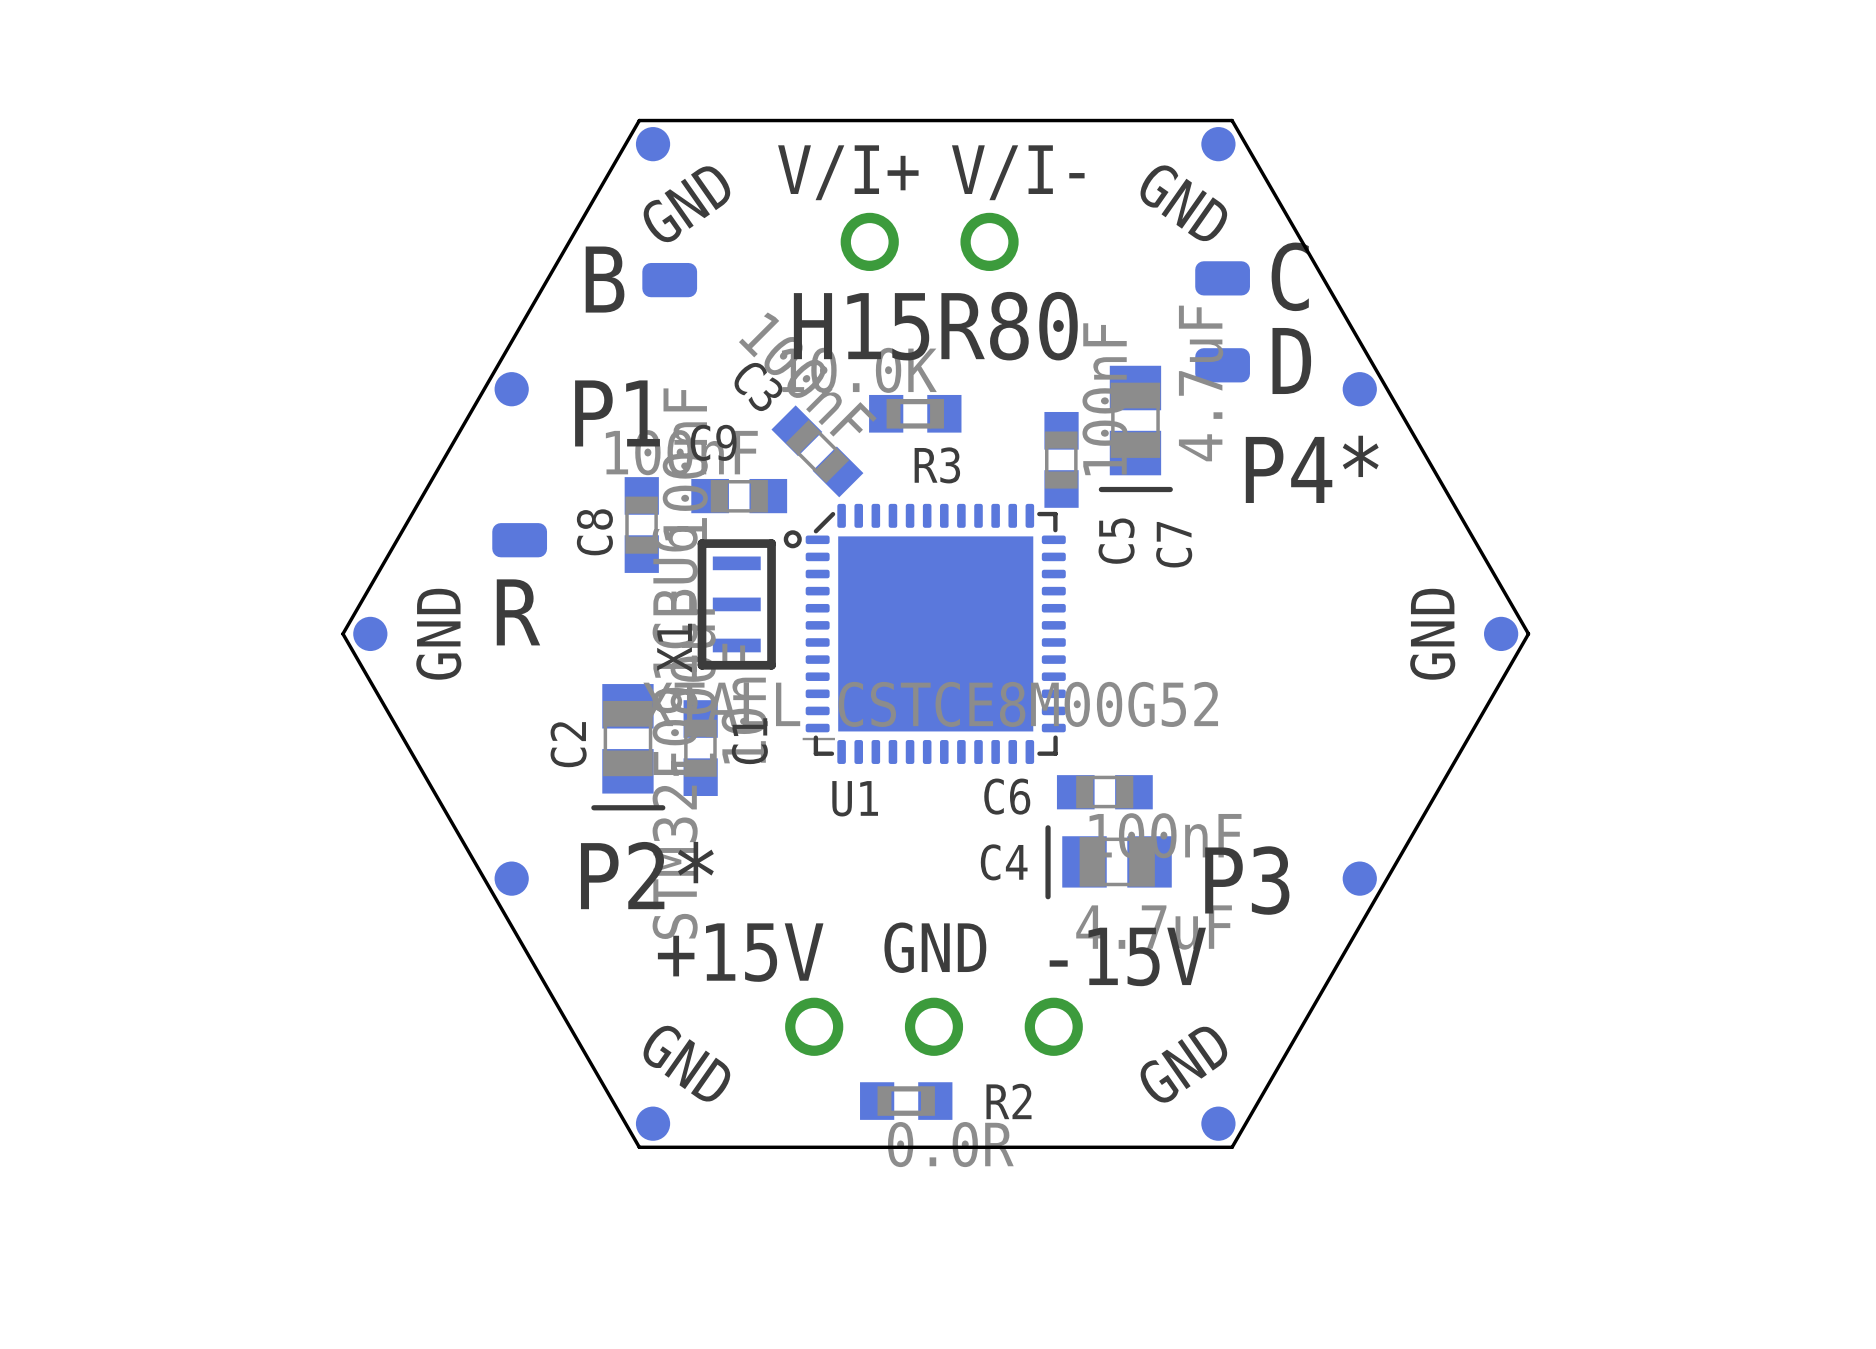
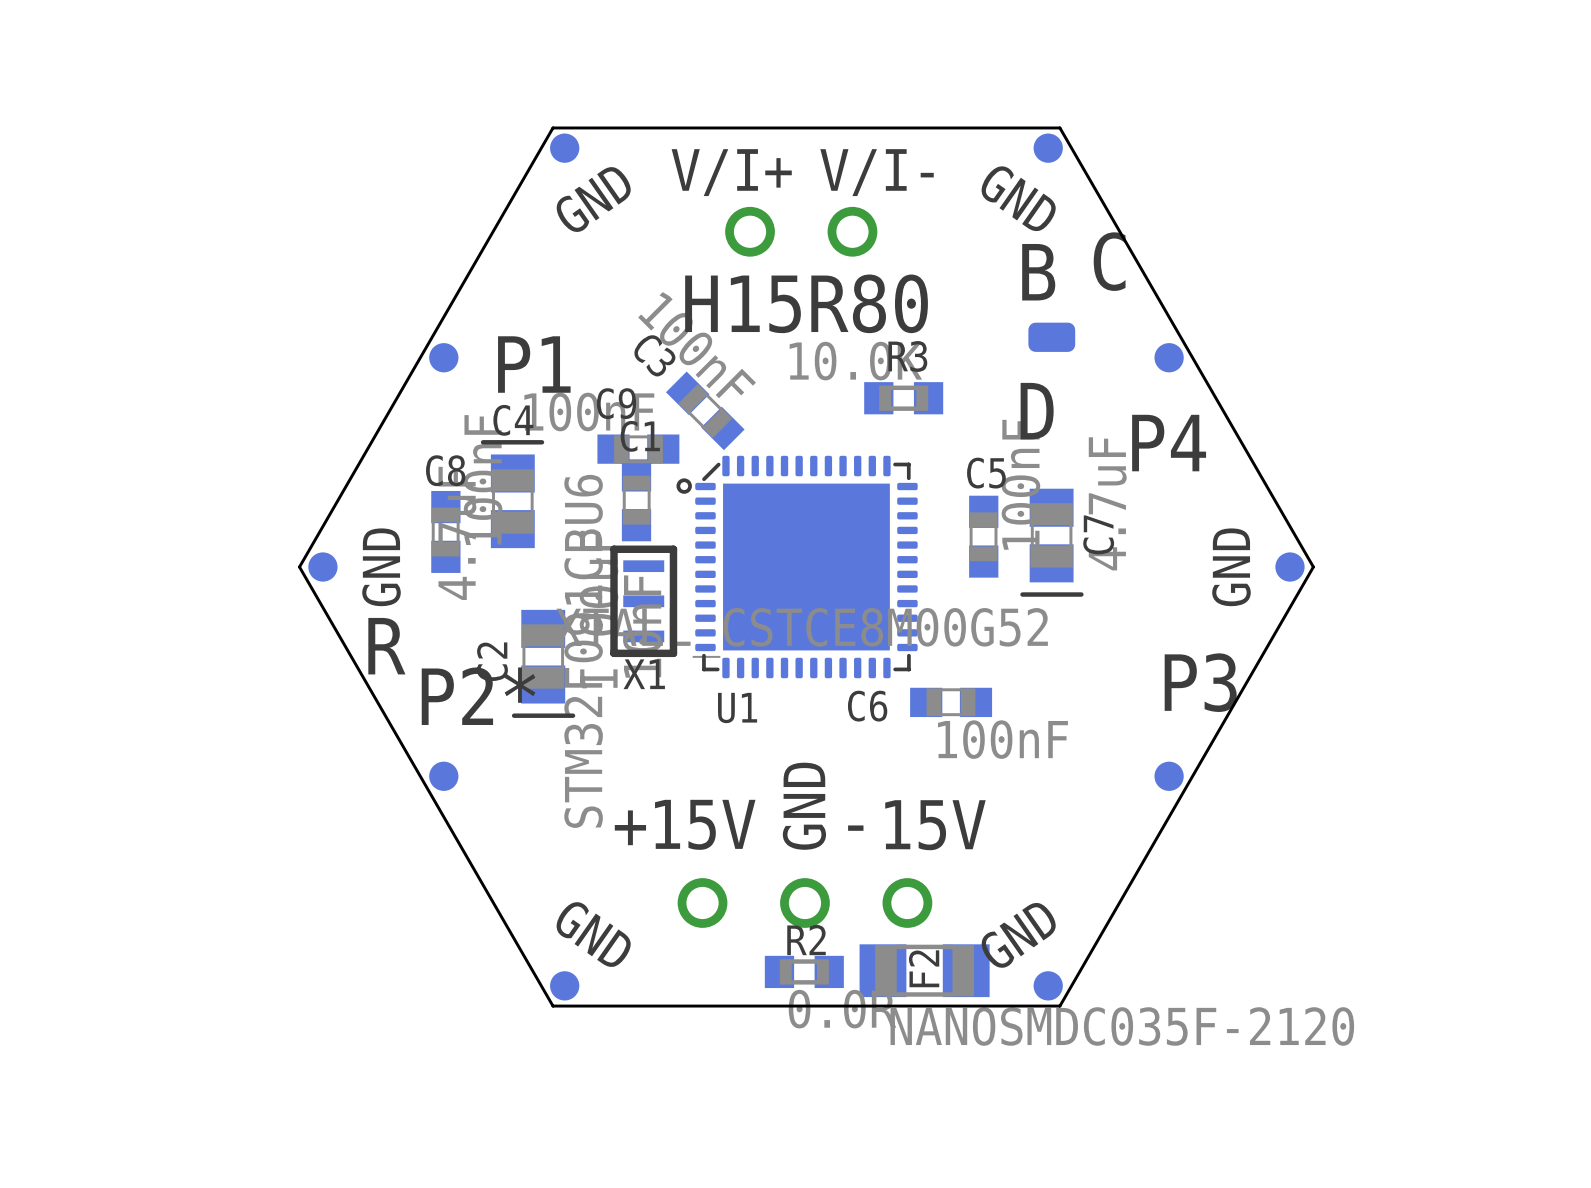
part: (1222, 278) -> none
text position: B (605, 279) -> B (1038, 272)
part: (669, 280) -> none
text position: D (1291, 360) -> D (1037, 411)
text position: P1 (617, 413) -> P1 (534, 364)
R3 position: (915, 413) -> (903, 398)
C7 position: (1135, 428) -> (1051, 542)
C5 position: (1061, 459) -> (983, 536)
R3 name position: R3 (937, 465) -> R3 (907, 356)
text: P4* (1312, 469) -> P4 (1169, 443)
C8 position: (641, 525) -> (445, 531)
C8 name rotation: 0° (594, 532) -> 90° clockwise (445, 470)
C8 name position: C8 (594, 532) -> C8 (445, 470)
part: (519, 540) -> none
C5 name rotation: 0° (1116, 541) -> 90° clockwise (986, 473)
C7 name position: C7 (1174, 544) -> C7 (1098, 534)
X1 position: (736, 604) -> (643, 601)
text position: R (518, 612) -> R (386, 646)
X1 name rotation: 0° (674, 647) -> 90° clockwise (644, 674)
X1 name position: X1 (674, 647) -> X1 (644, 674)
C1 name rotation: 0° (749, 741) -> 90° clockwise (640, 436)
C1 name position: C1 (749, 741) -> C1 (640, 436)
C1 position: (700, 748) -> (636, 500)
C4 rotation: 0° (1108, 862) -> 90° clockwise (512, 494)
C4 position: (1108, 862) -> (512, 494)
text position: P2* (647, 875) -> P2* (478, 696)
text position: P3 (1247, 880) -> P3 (1200, 682)
text: none -> 15V (705, 824)
text: none -> - (855, 828)
text rotation: 0° (935, 947) -> 90° counterclockwise (804, 806)
text: +15V (740, 952) -> + (630, 827)
text: -15V (1127, 956) -> 15V (935, 825)
R2 position: (906, 1101) -> (804, 971)
R2 name position: R2 (1008, 1101) -> R2 (806, 940)
F2: none -> NANOSMDC035F-2120 (924, 970)

